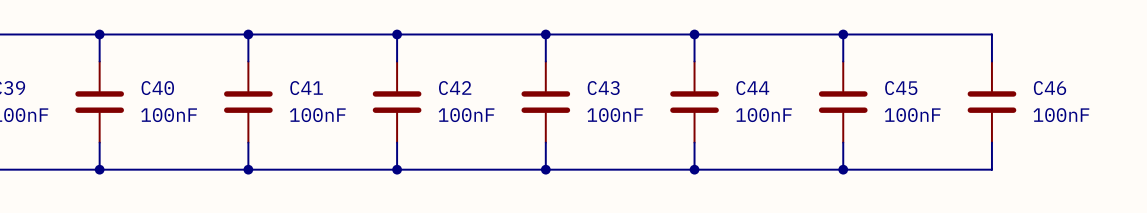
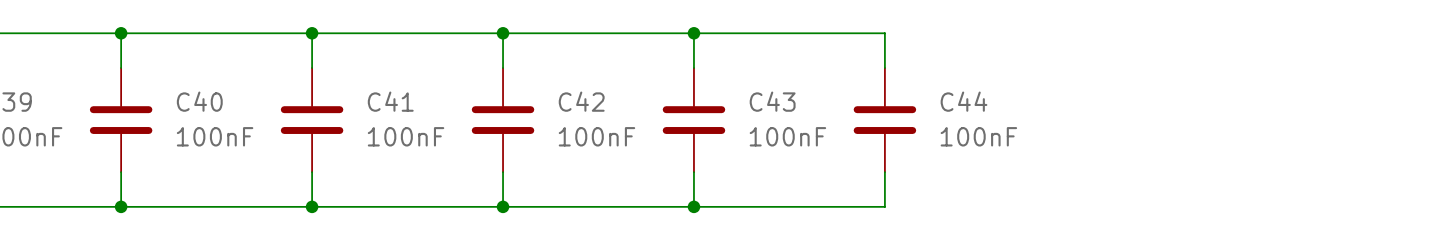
wire: (694, 34) (991, 34) (991, 61) -> none
junction: (694, 34) -> none
wire: (843, 34) (843, 61) -> none
junction: (843, 34) -> none
C45: 100nF (843, 102) -> none
C46: 100nF (991, 102) -> none
wire: (843, 142) (843, 169) -> none
wire: (991, 142) (991, 169) (694, 169) -> none
junction: (694, 169) -> none
junction: (843, 169) -> none

